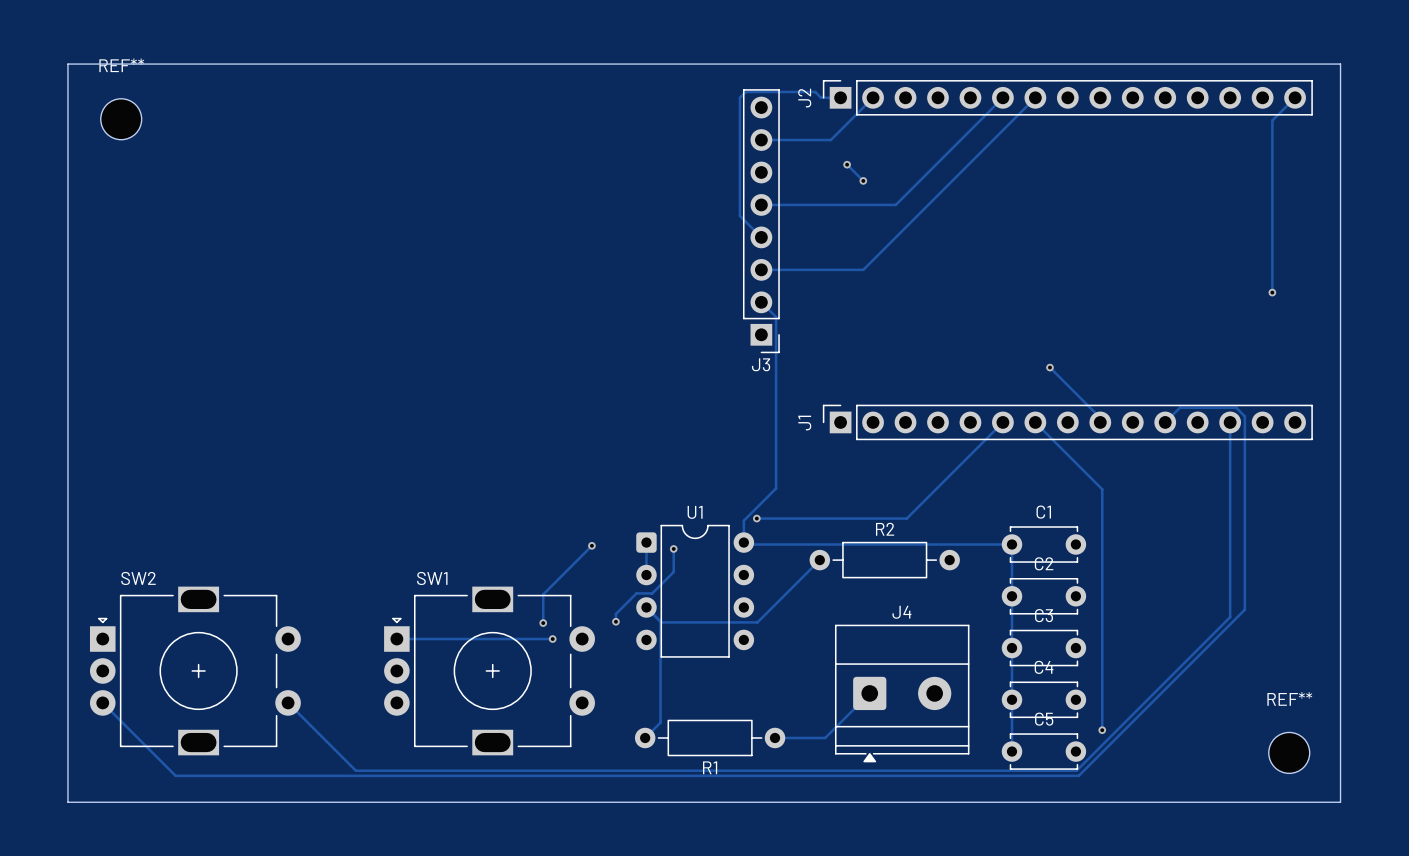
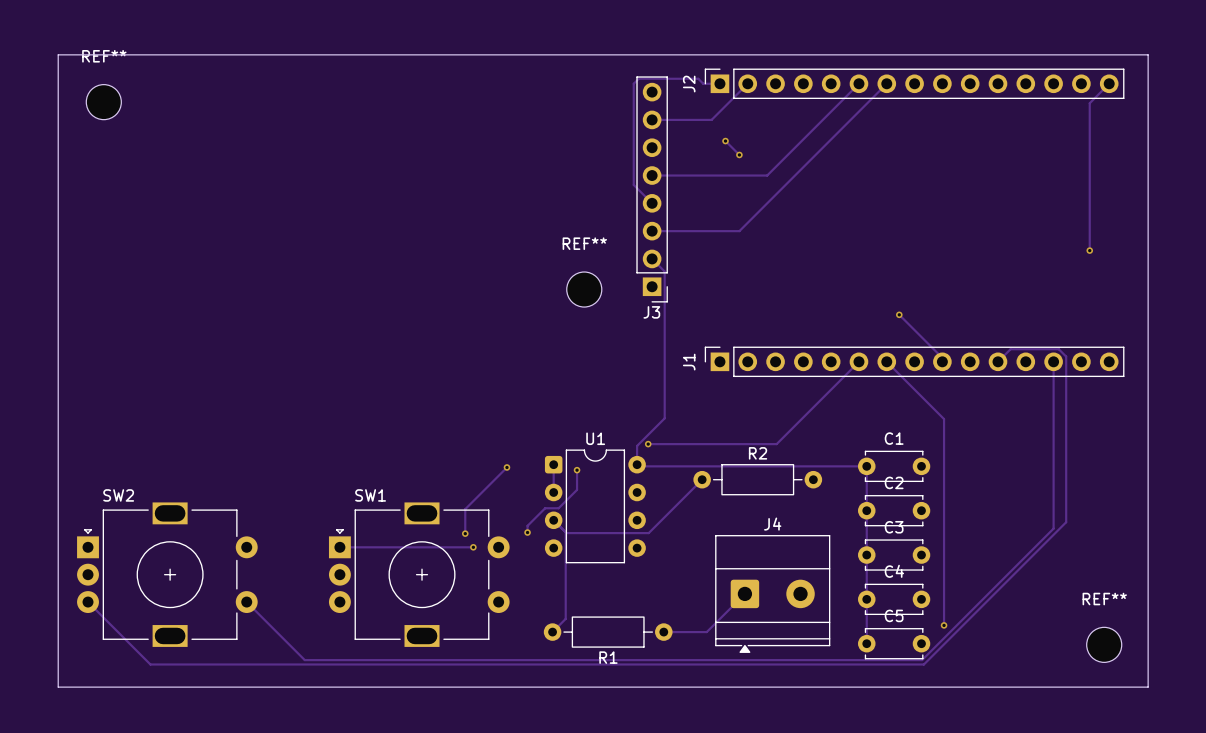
REF**: none -> (584, 289)

